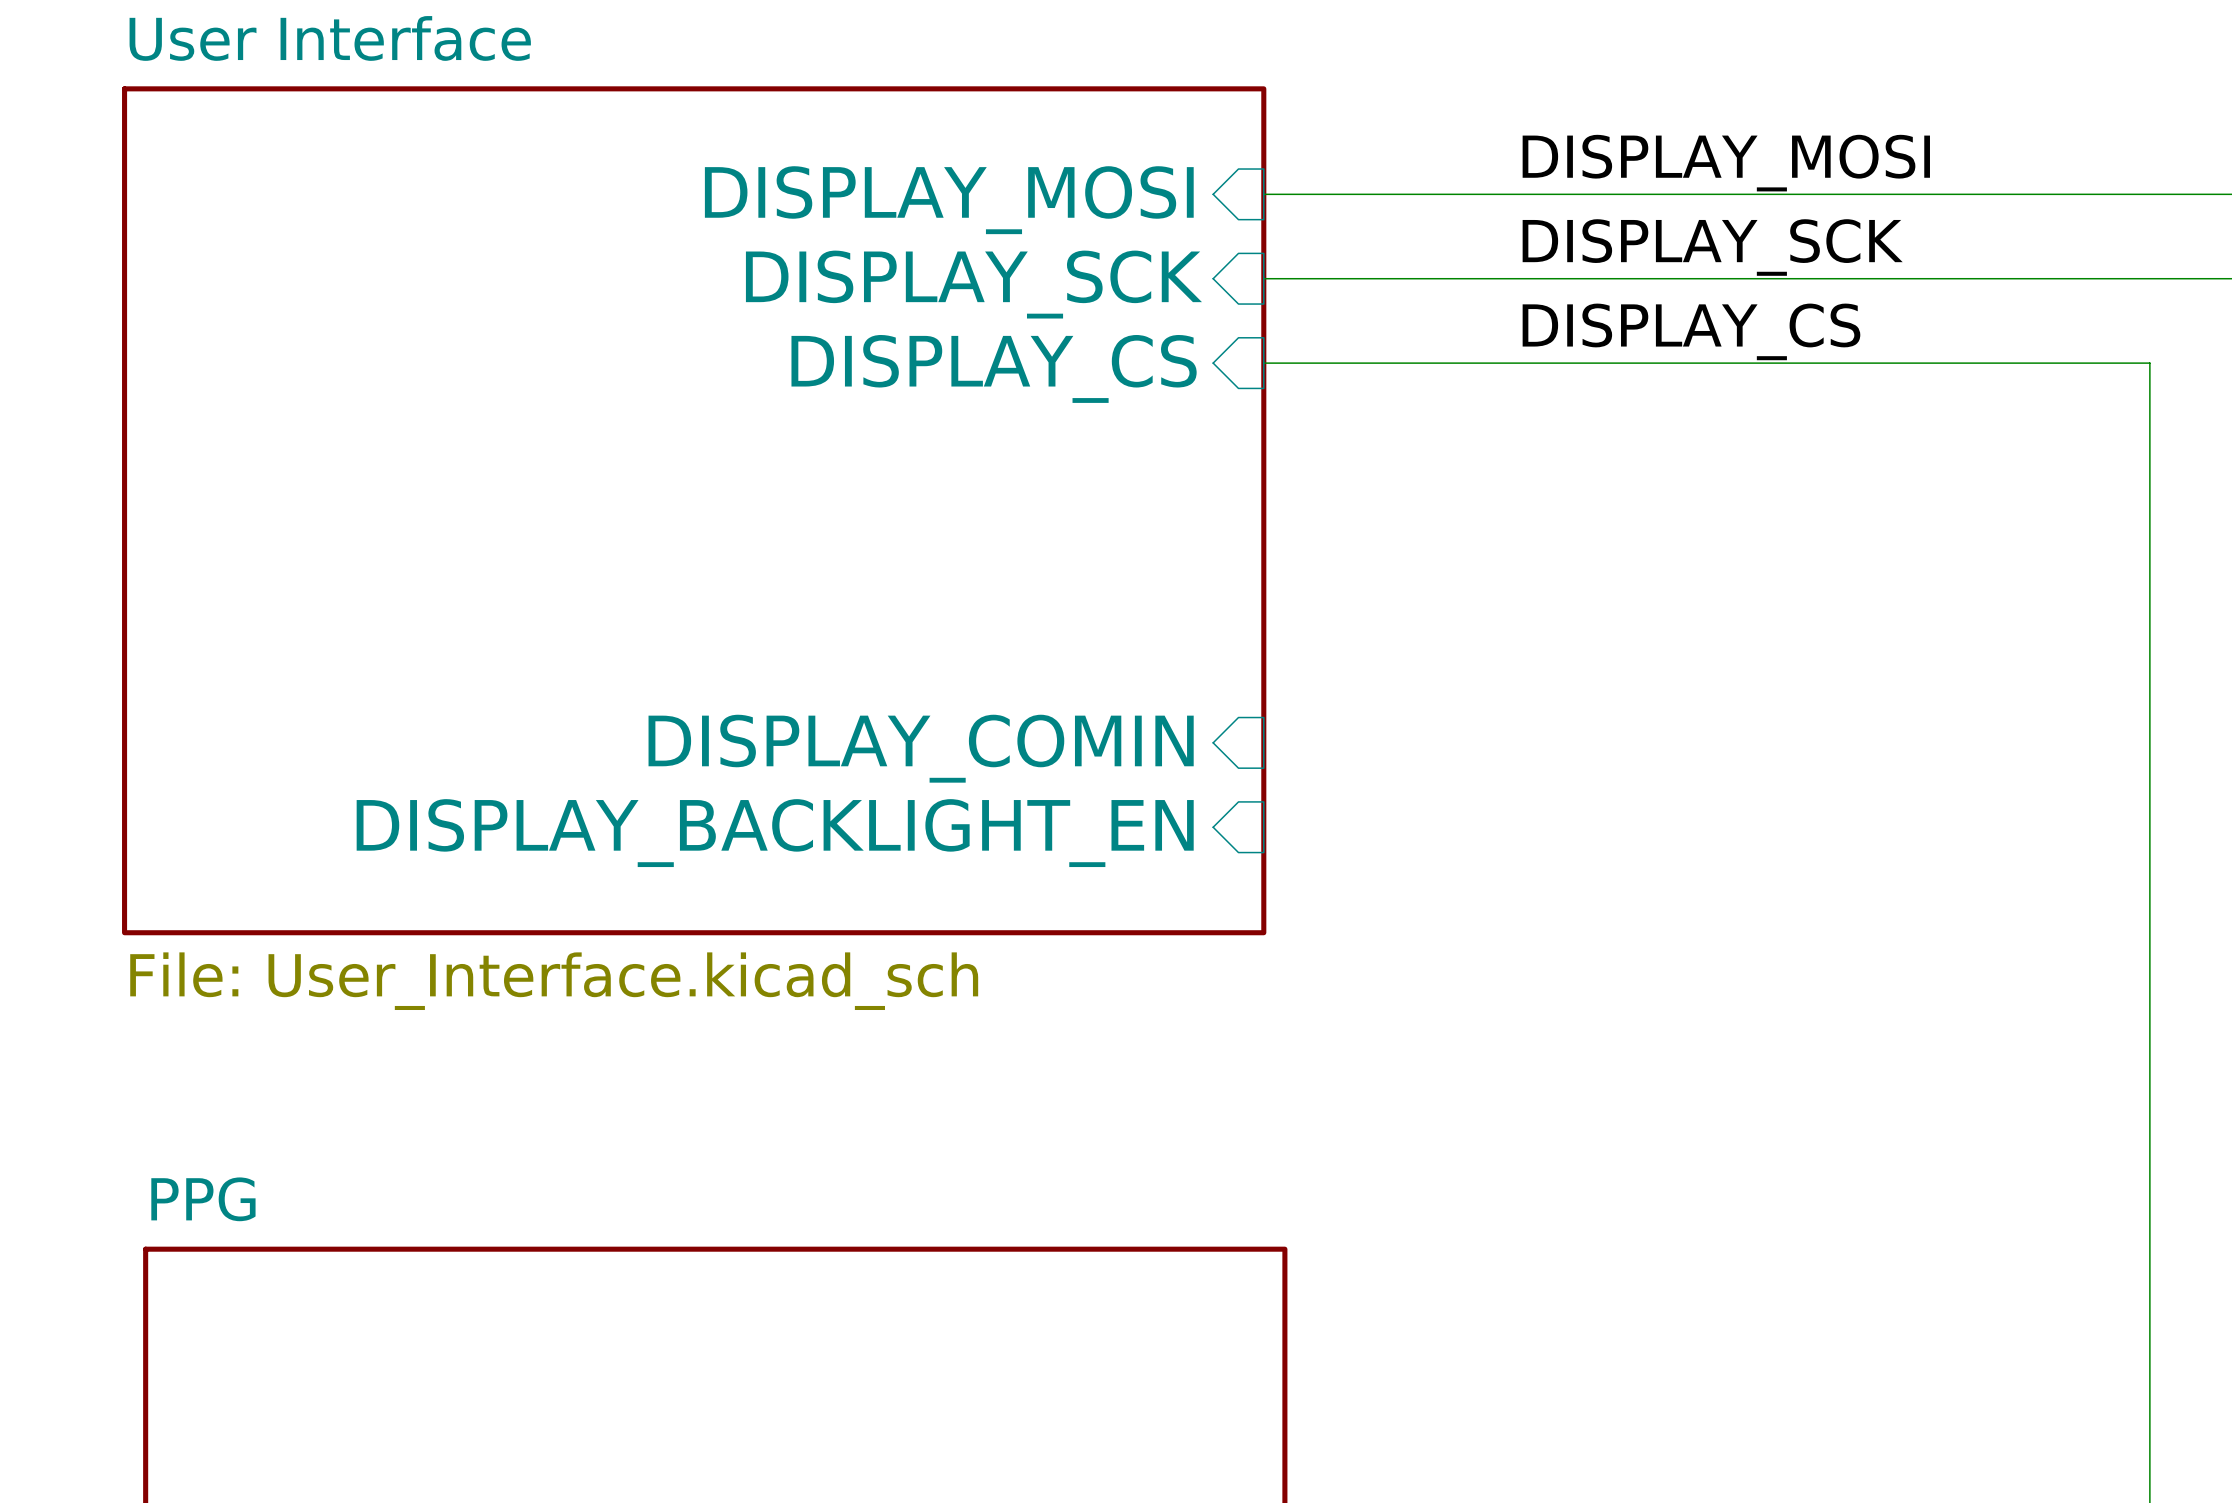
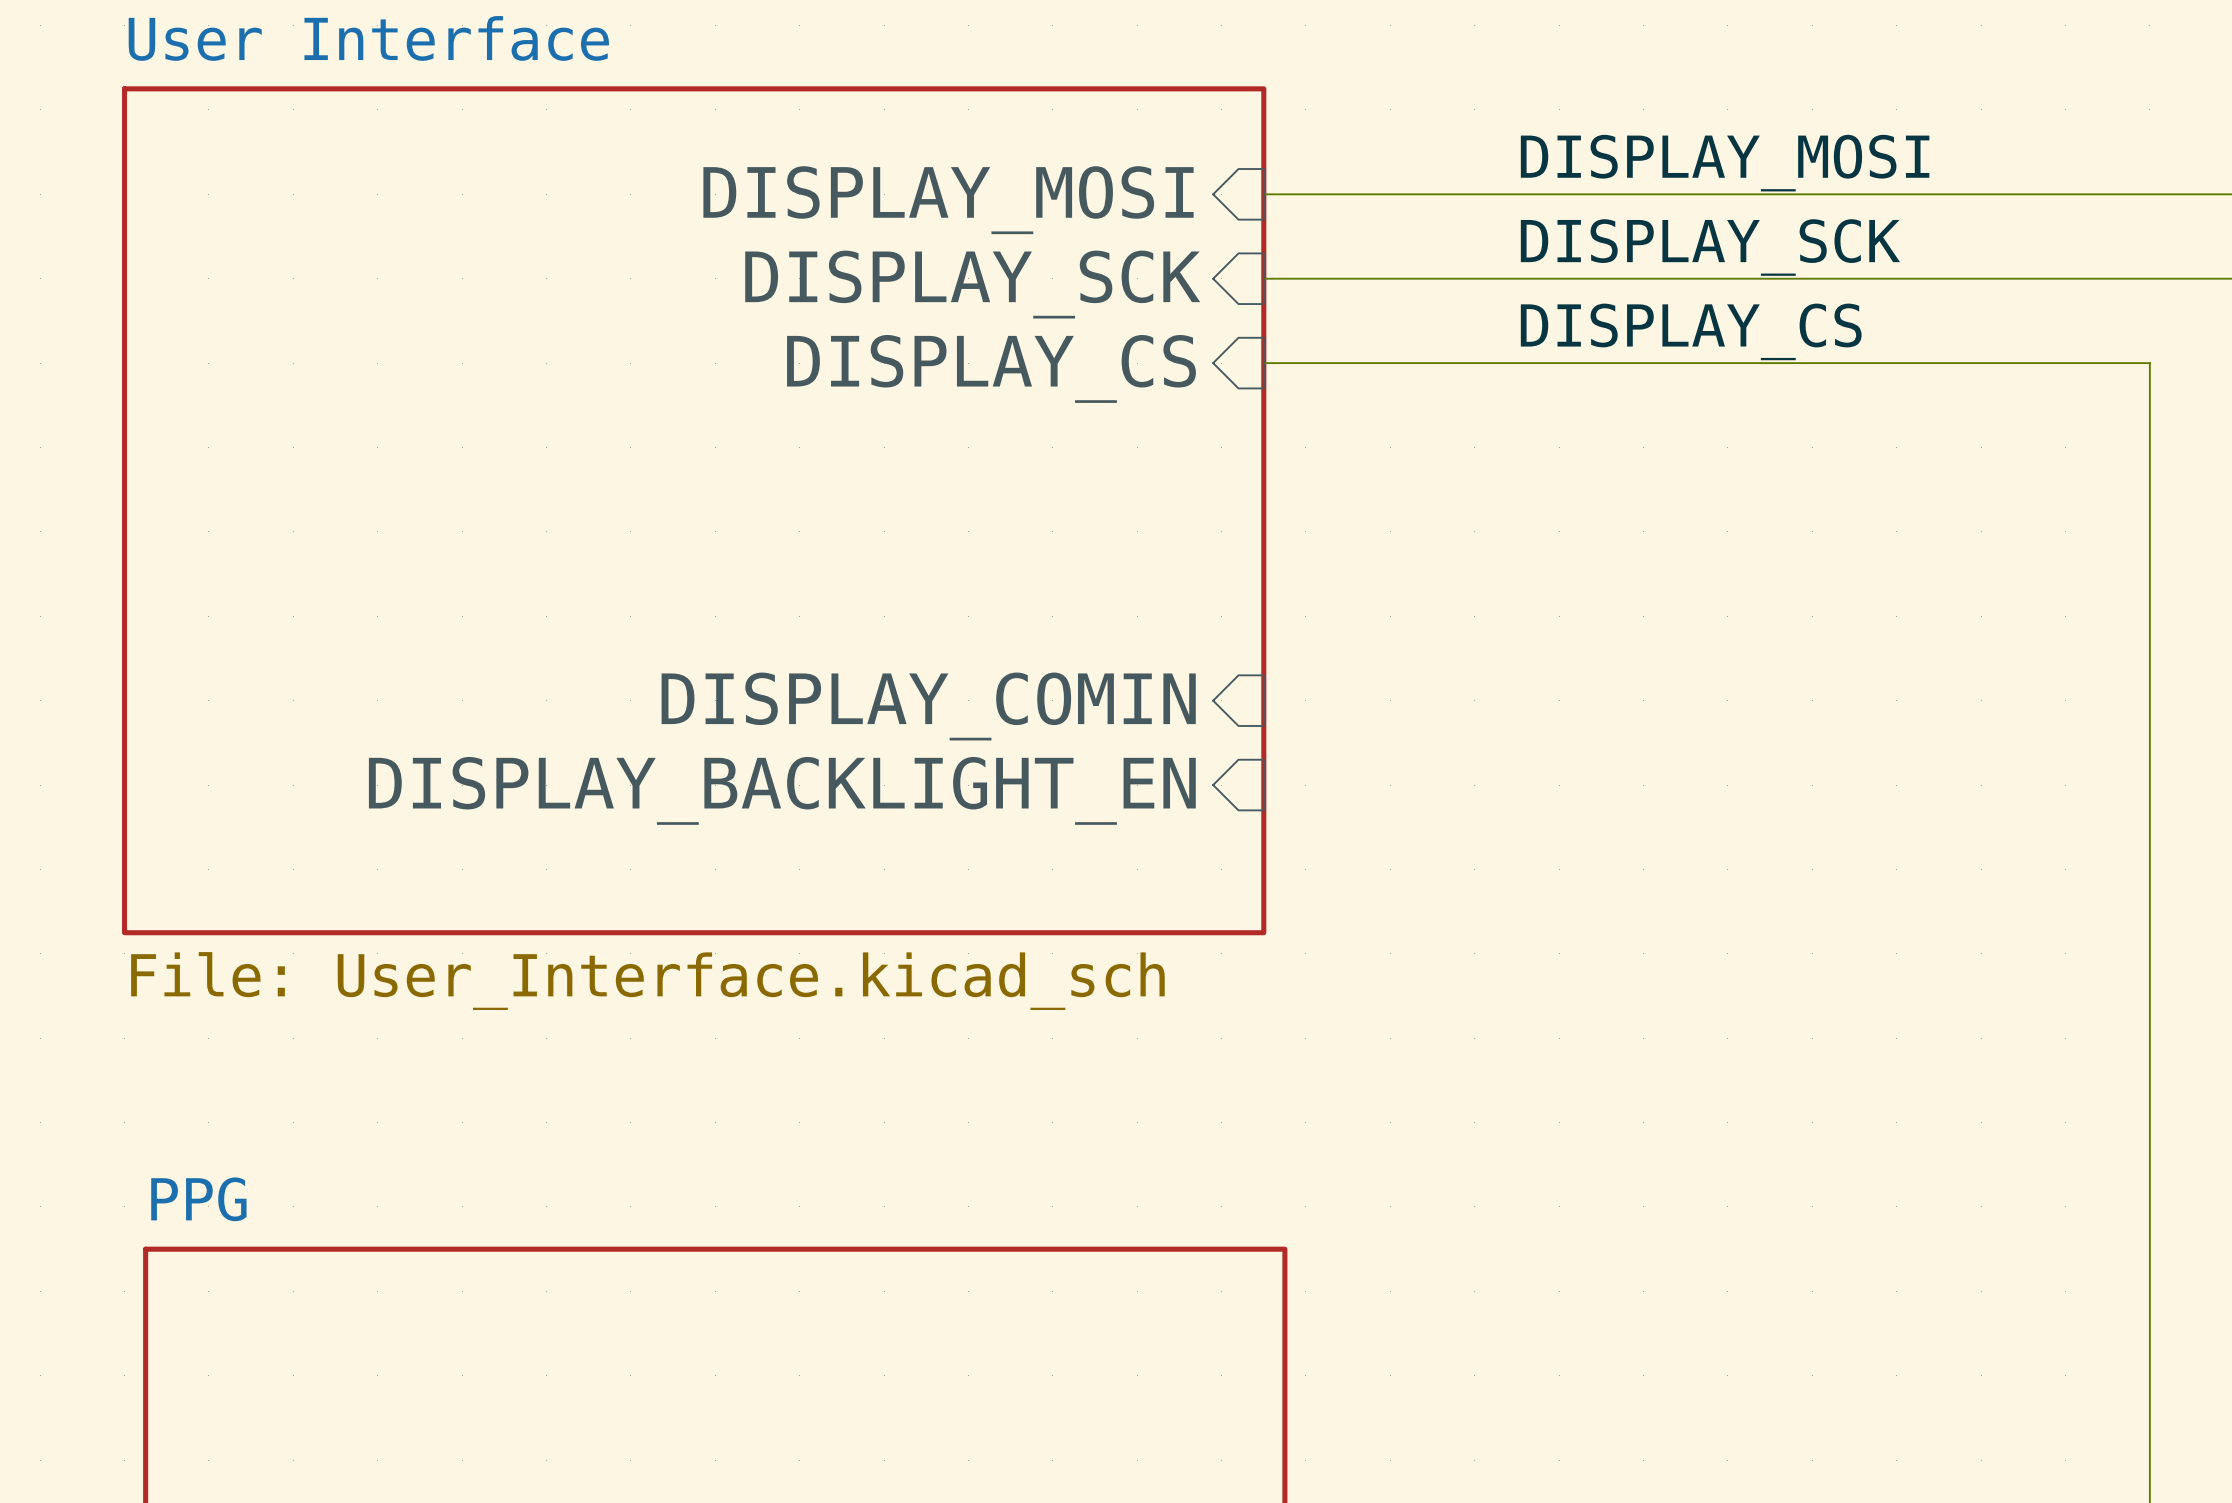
sheet pin position: DISPLAY_COMIN (921, 748) -> DISPLAY_COMIN (928, 706)
sheet pin position: DISPLAY_BACKLIGHT_EN (775, 833) -> DISPLAY_BACKLIGHT_EN (782, 790)

